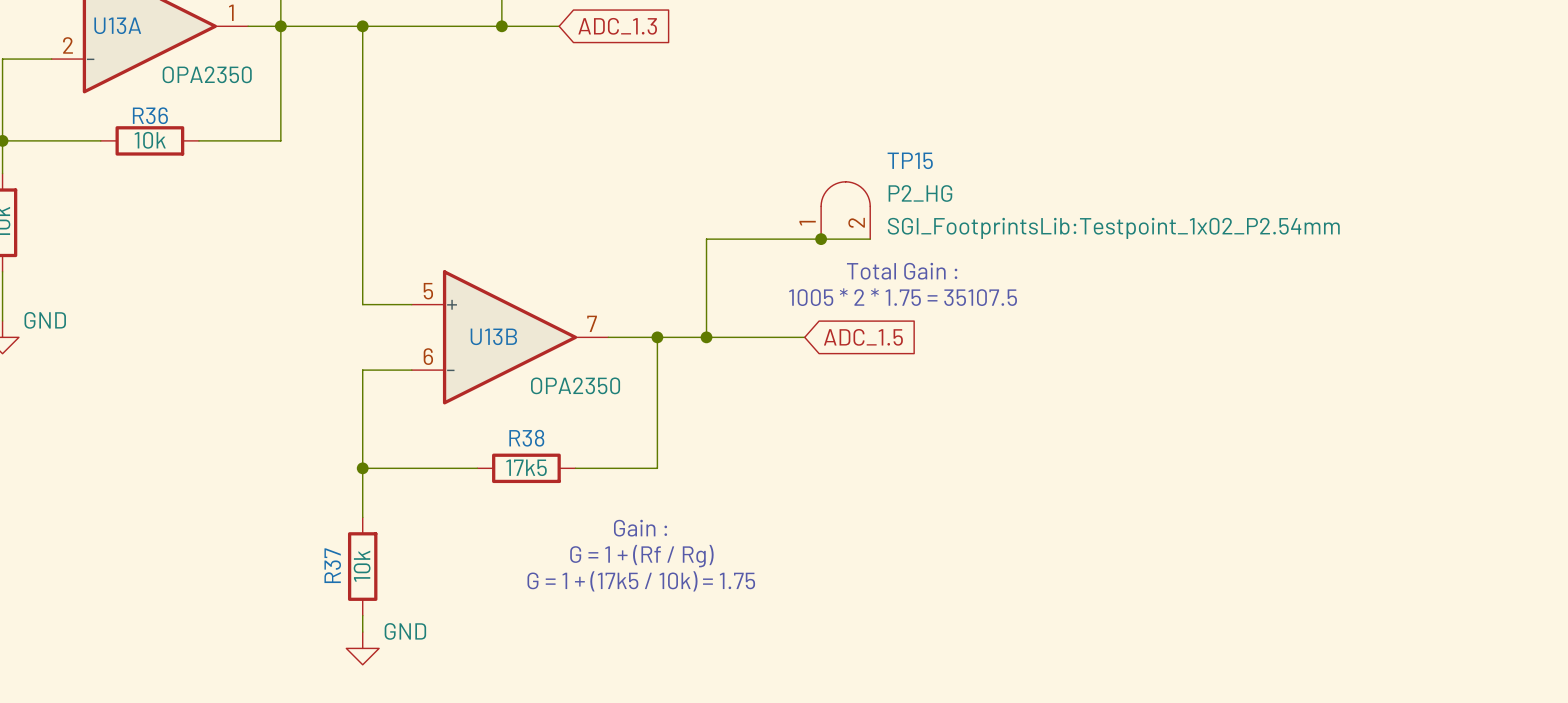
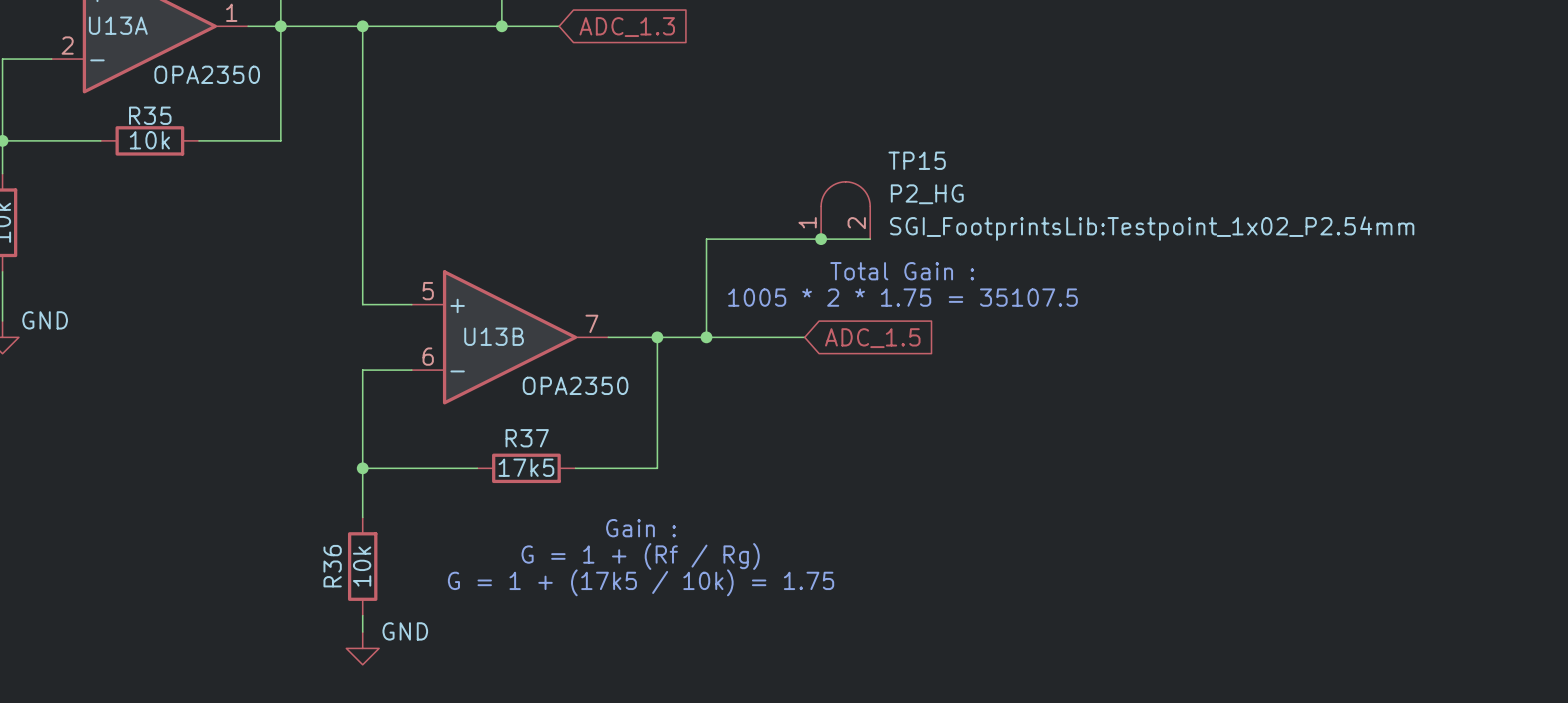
R36 name: R36 (150, 115) -> R35 (150, 115)
R38 name: R38 (526, 438) -> R37 (527, 438)
R37 name: R37 (332, 565) -> R36 (332, 566)

